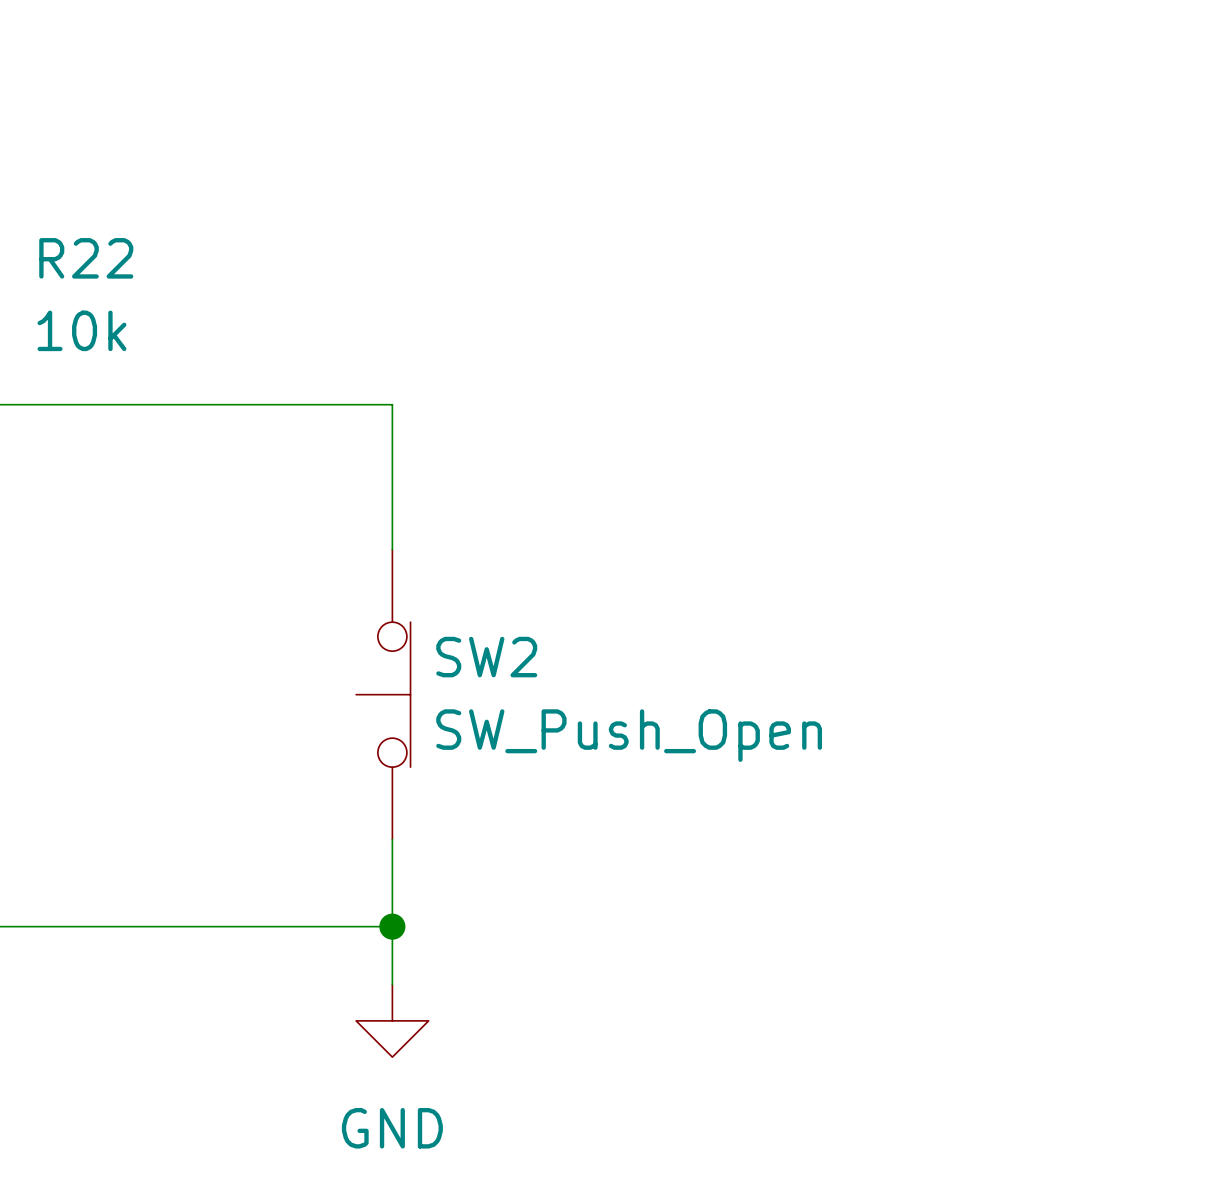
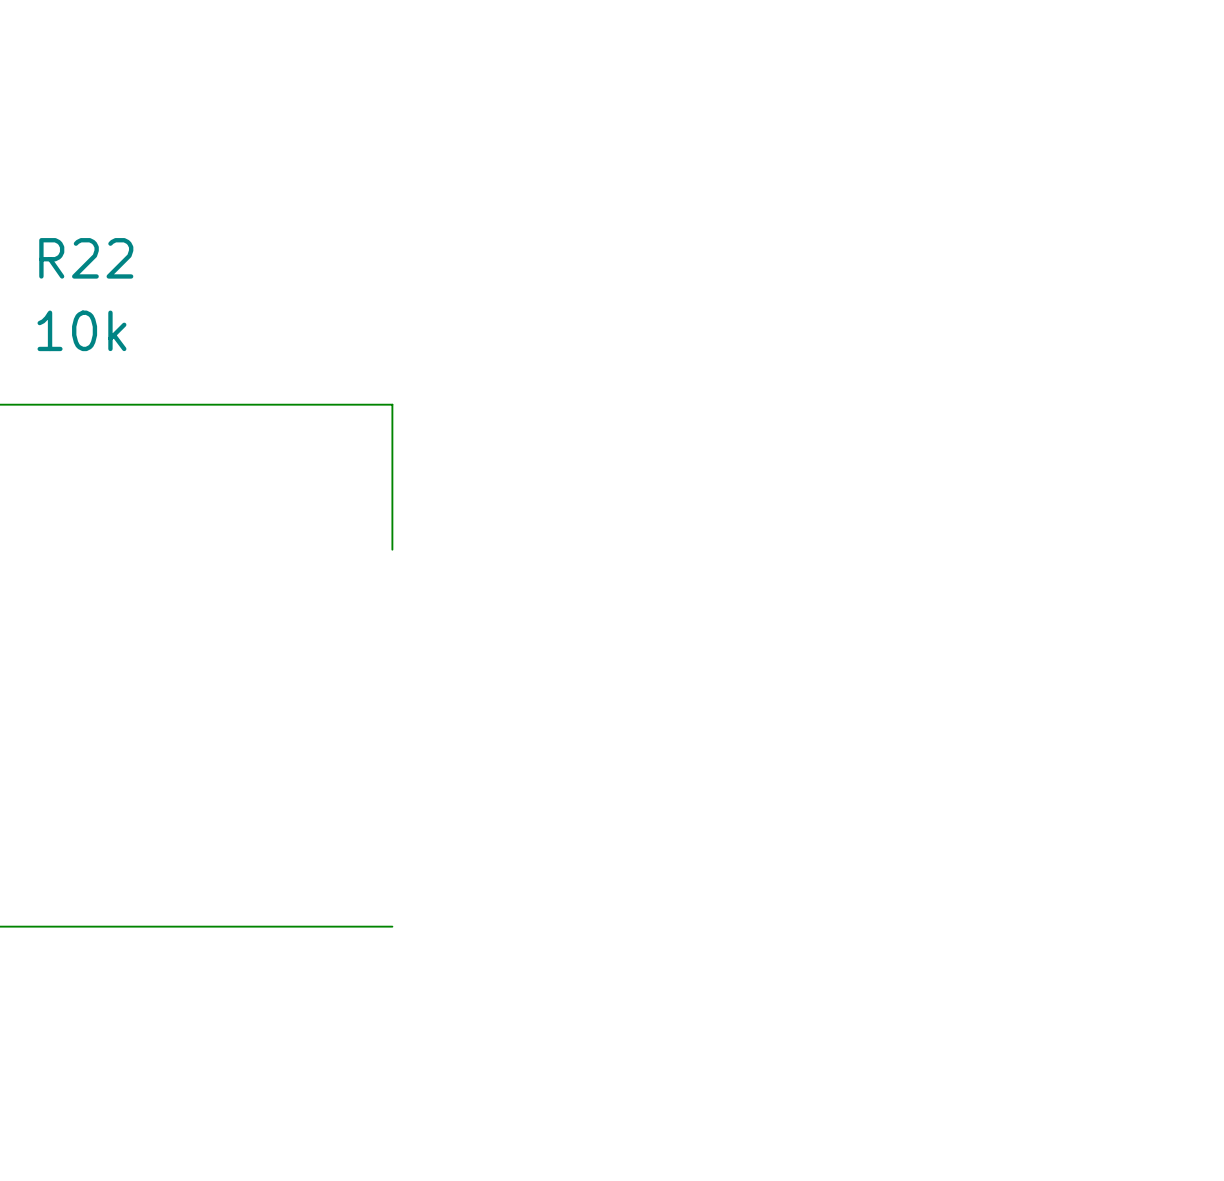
SW2: SW_Push_Open (383, 694) -> none
wire: (392, 839) (392, 984) -> none
junction: (392, 926) -> none
power symbol: GND (392, 1020) -> none

